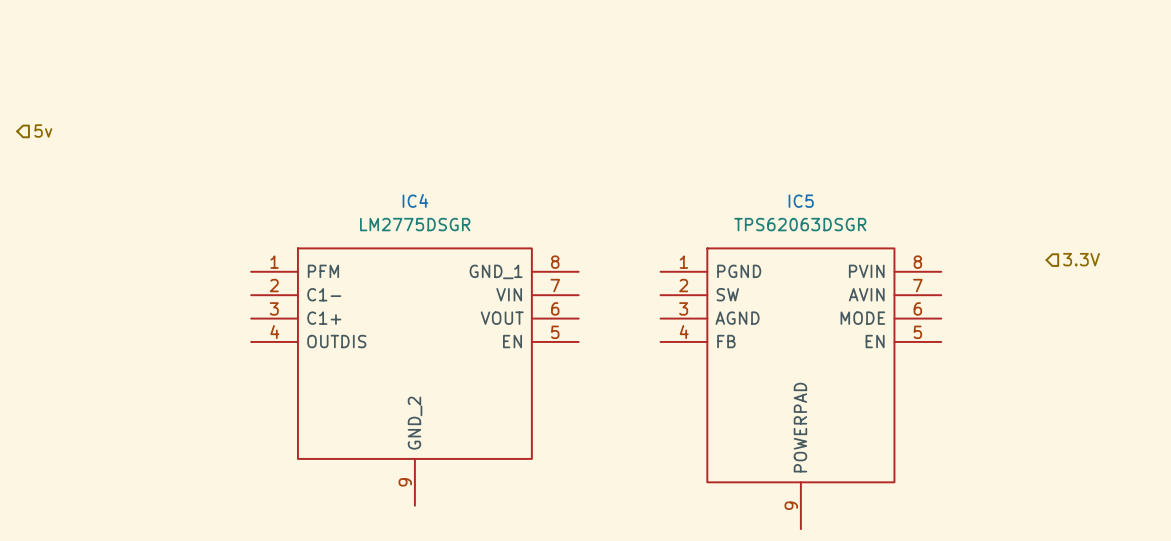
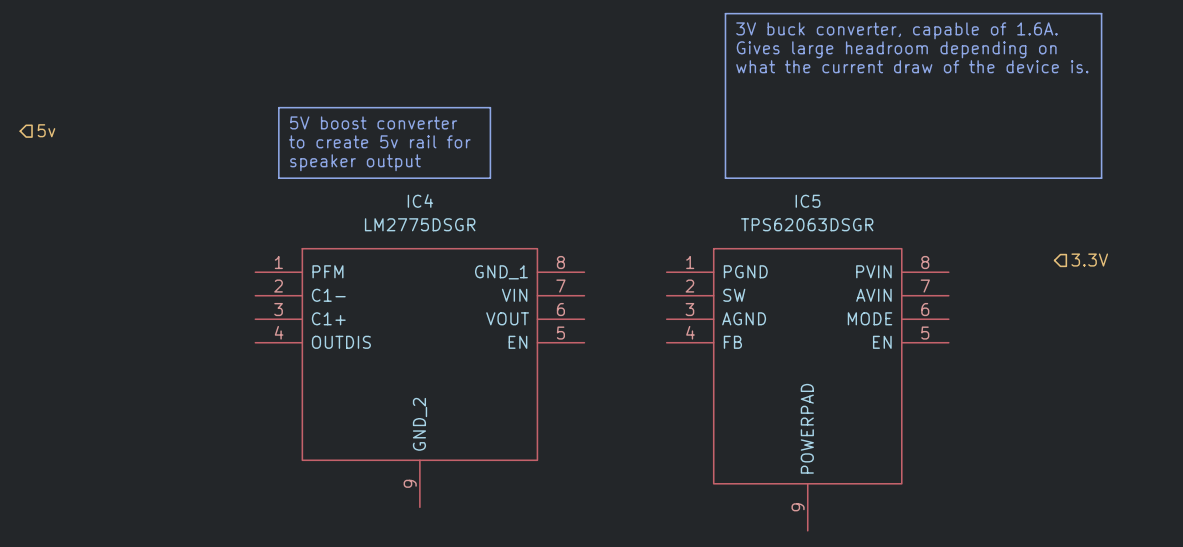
line: none -> (725, 13) (1101, 13) (1101, 178) (725, 178) (725, 13)
text: none -> 3V buck converter, capable of 1.6A. (896, 30)
text: none -> Gives large headroom depending on (896, 49)
text: none -> what the current draw of the device is. (912, 66)
line: none -> (278, 107) (490, 107) (490, 178) (278, 178) (278, 107)
text: none -> 5V boost converter (373, 122)
text: none -> to create 5v rail for (379, 141)
text: none -> speaker output (355, 162)

